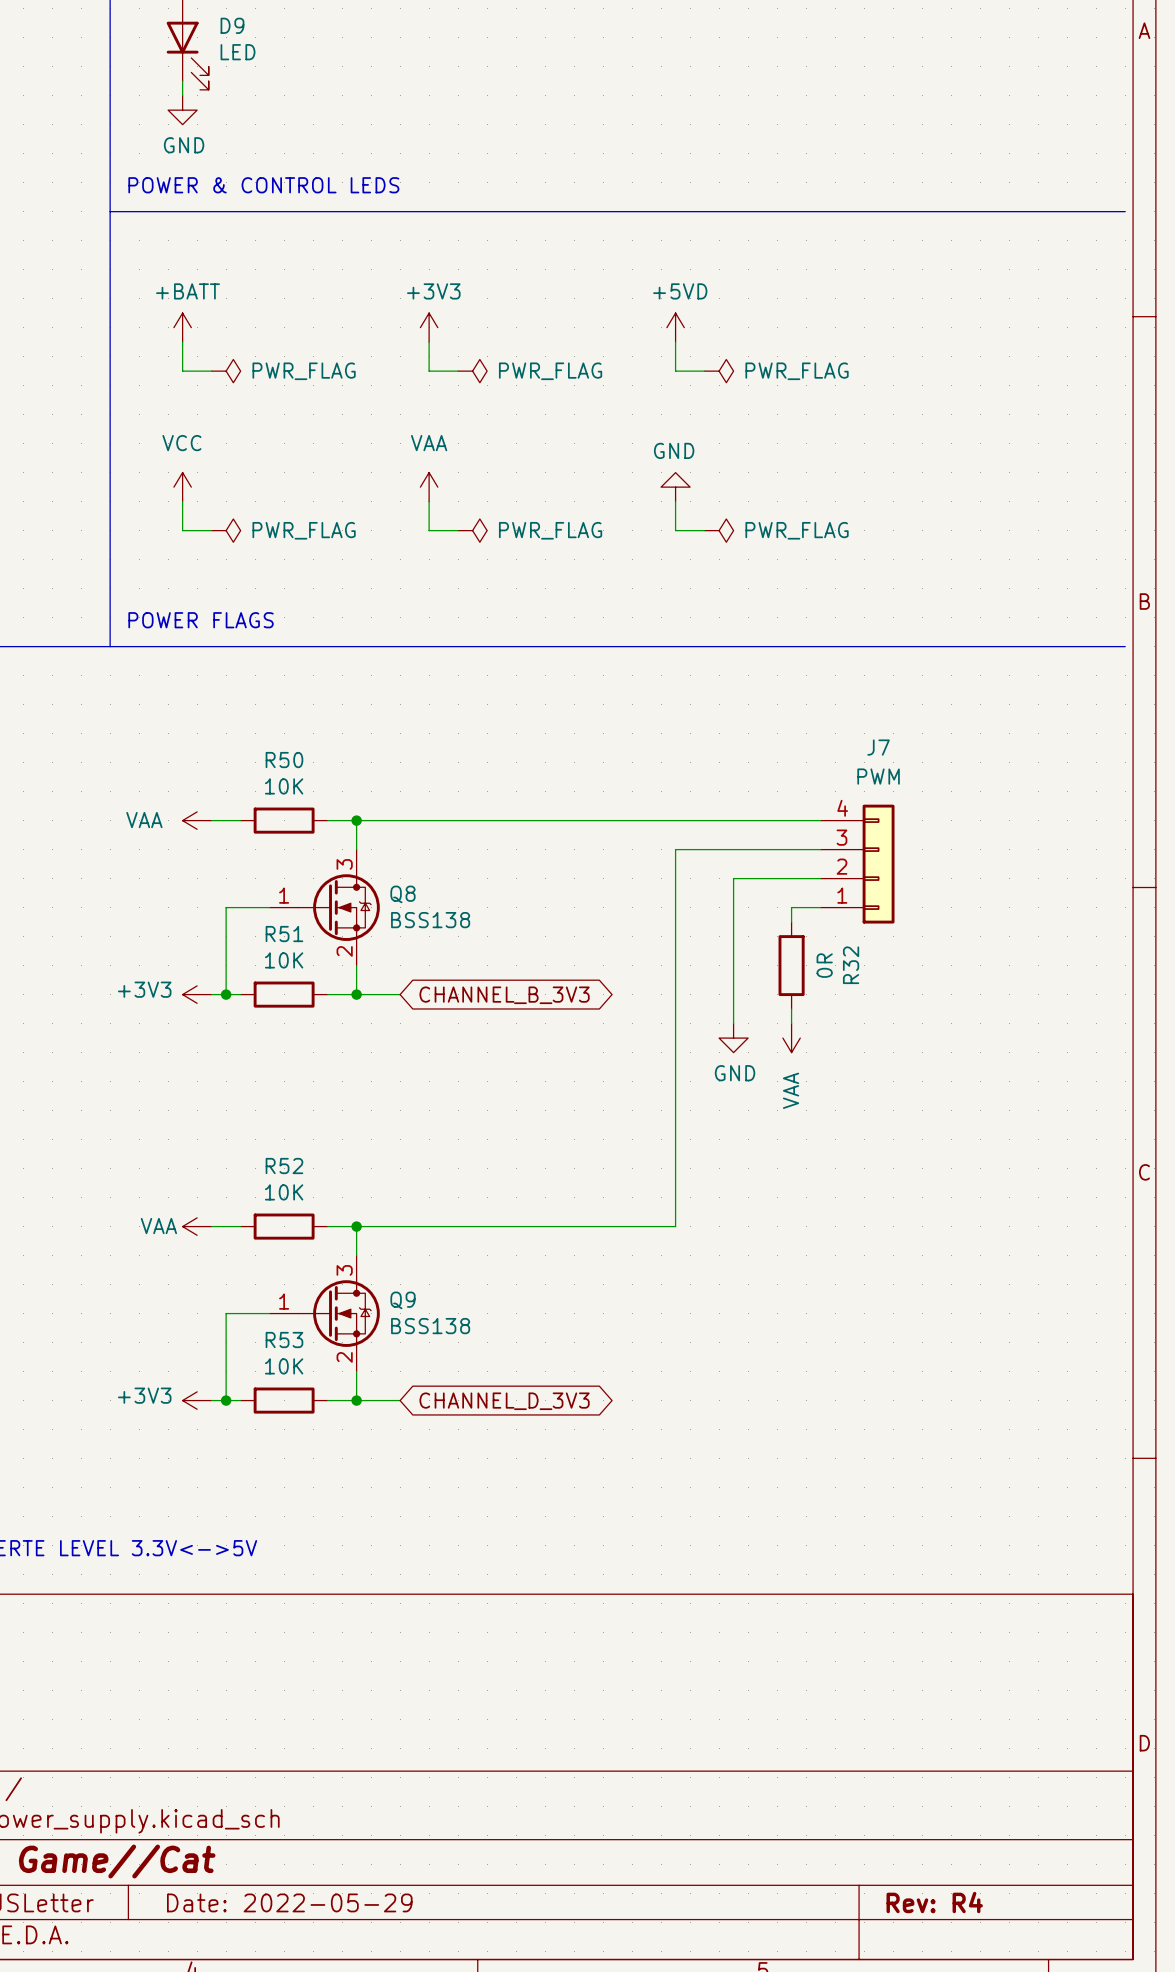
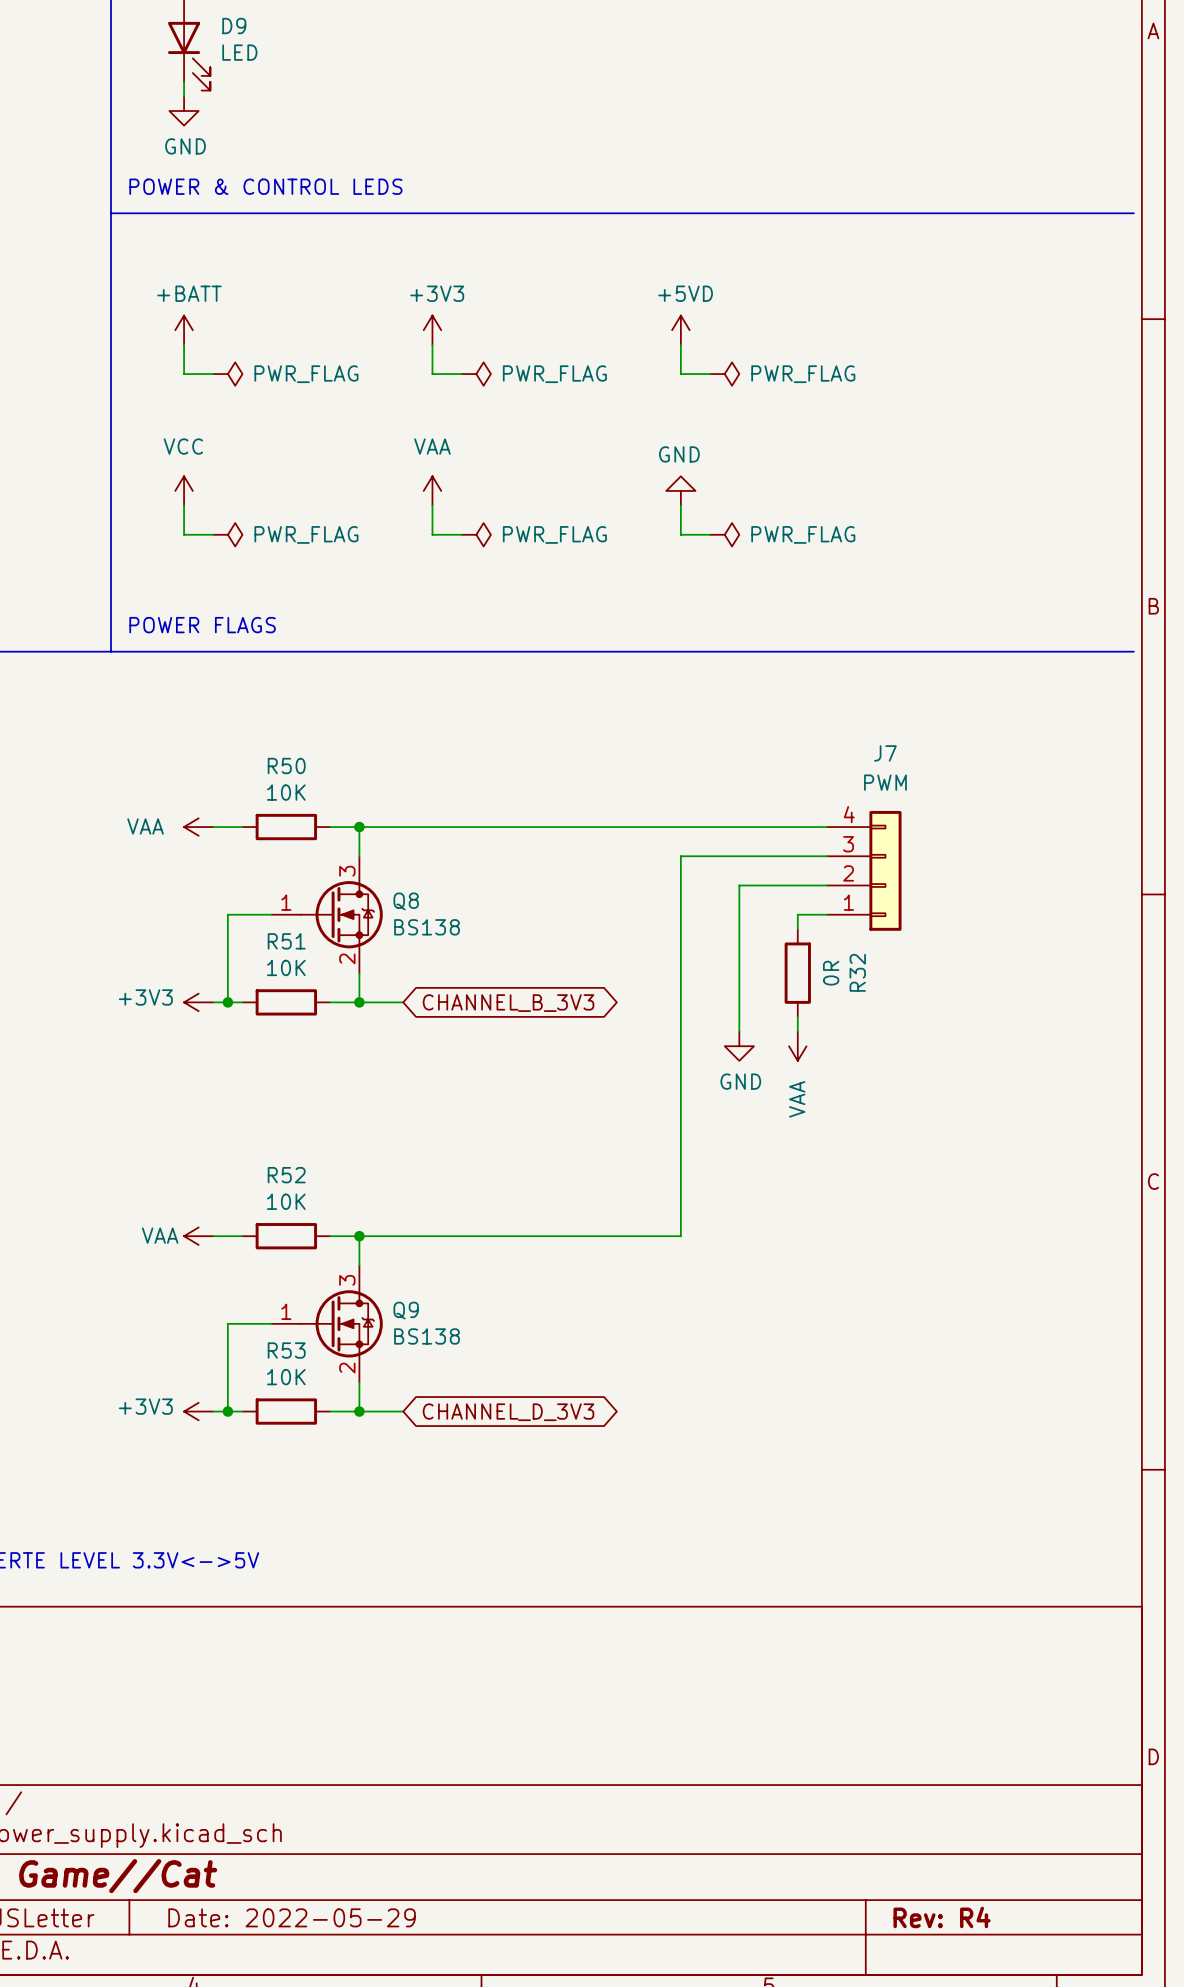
Q8 value: BSS138 (430, 920) -> BS138 (427, 927)
Q9 value: BSS138 (430, 1326) -> BS138 (427, 1336)

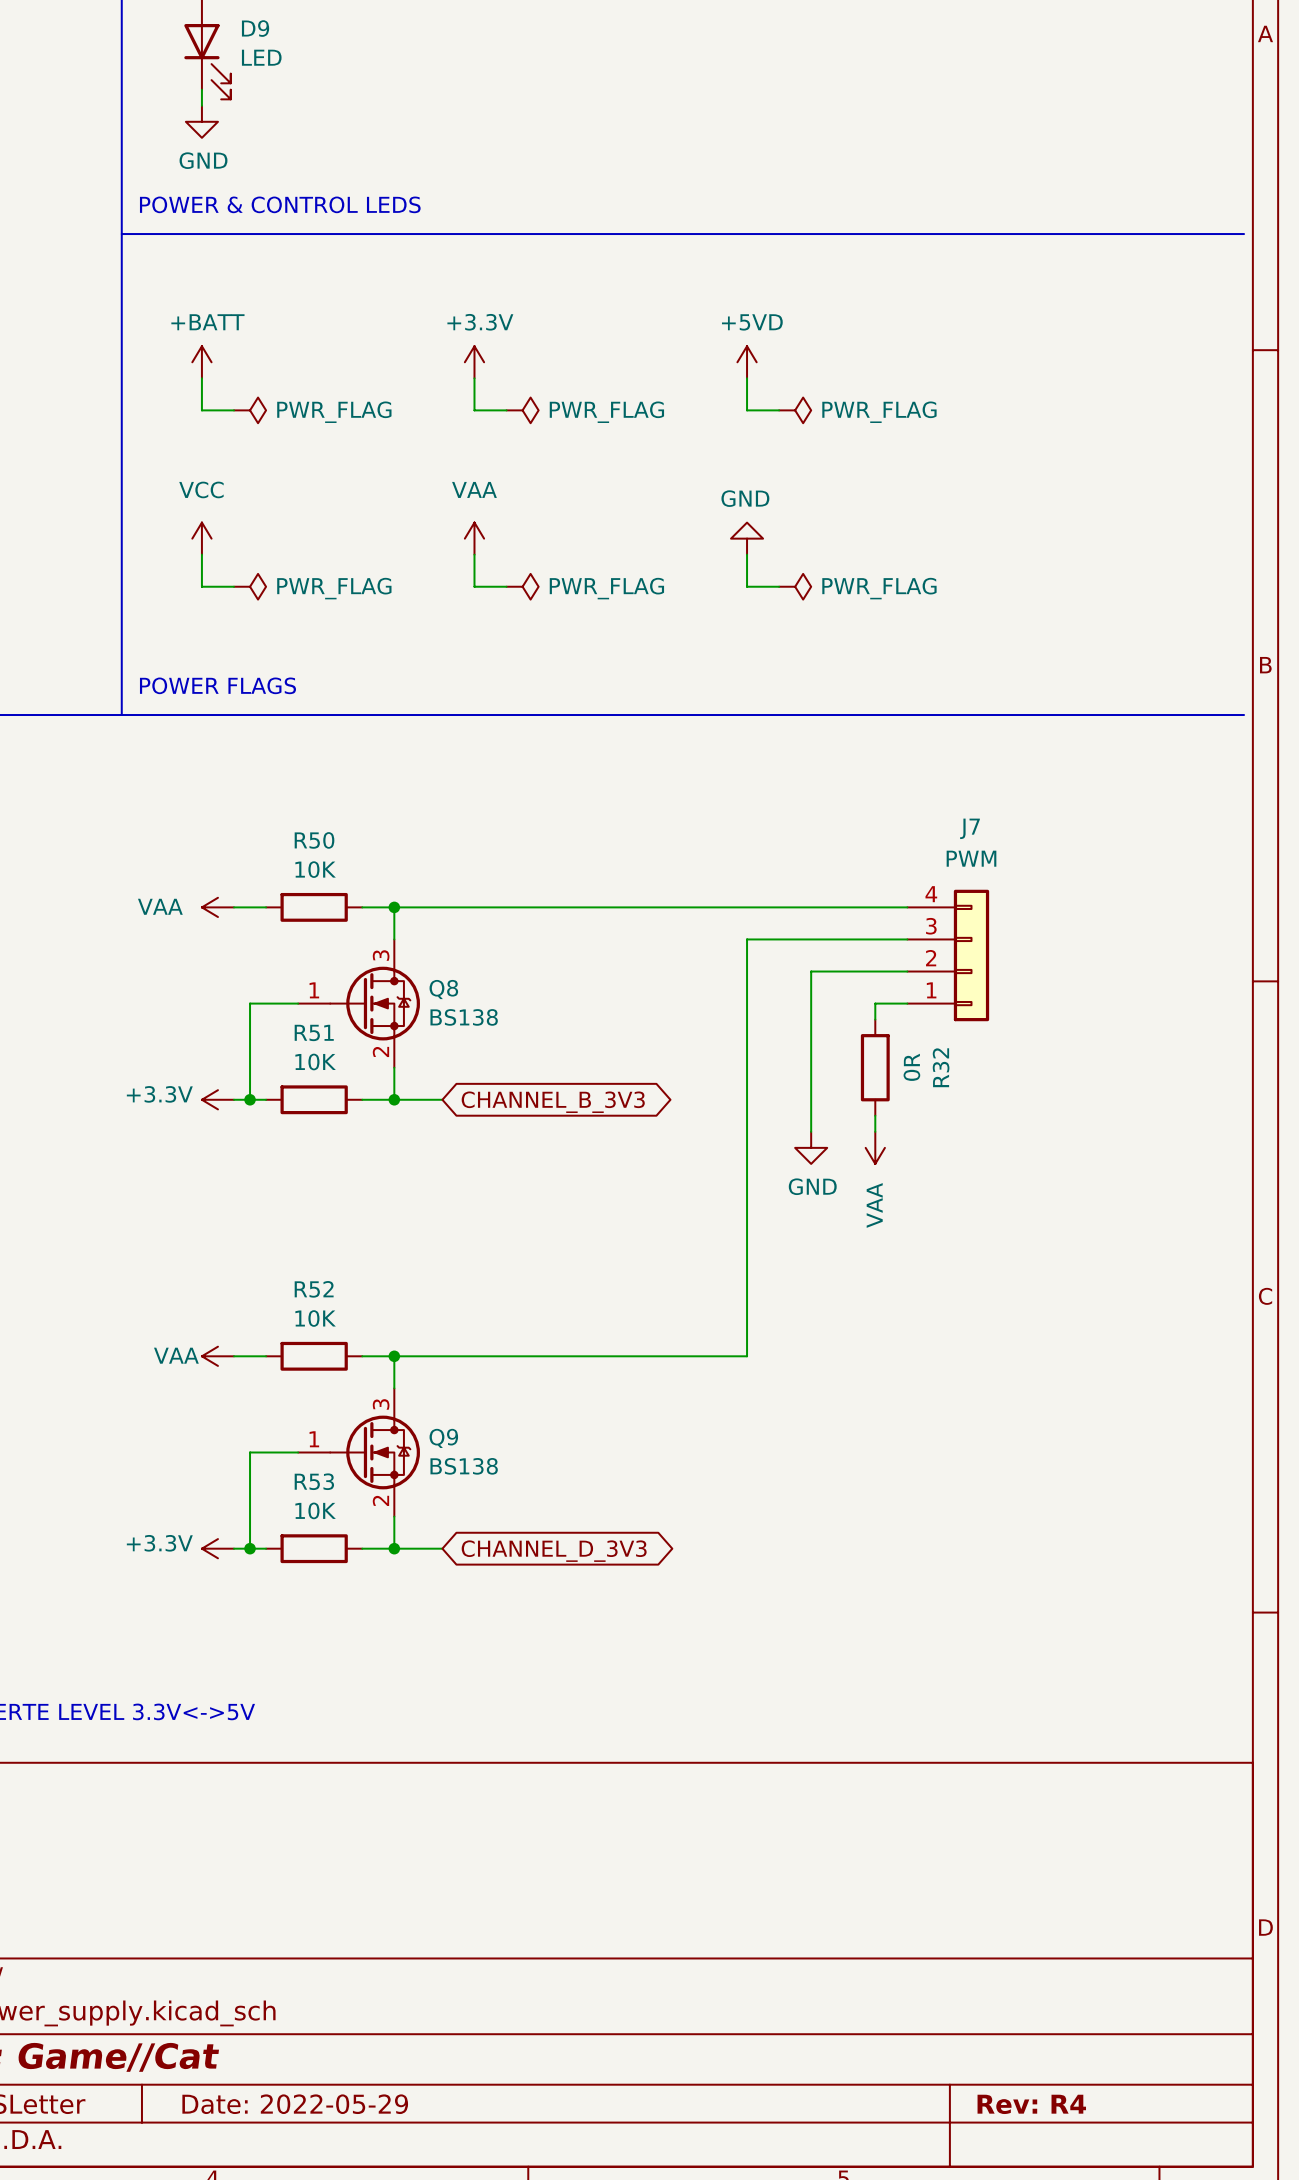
power symbol: +3V3 (432, 330) -> +3.3V (474, 362)
power symbol: +3V3 (198, 1002) -> +3.3V (217, 1099)
power symbol: +3V3 (198, 1411) -> +3.3V (217, 1548)

